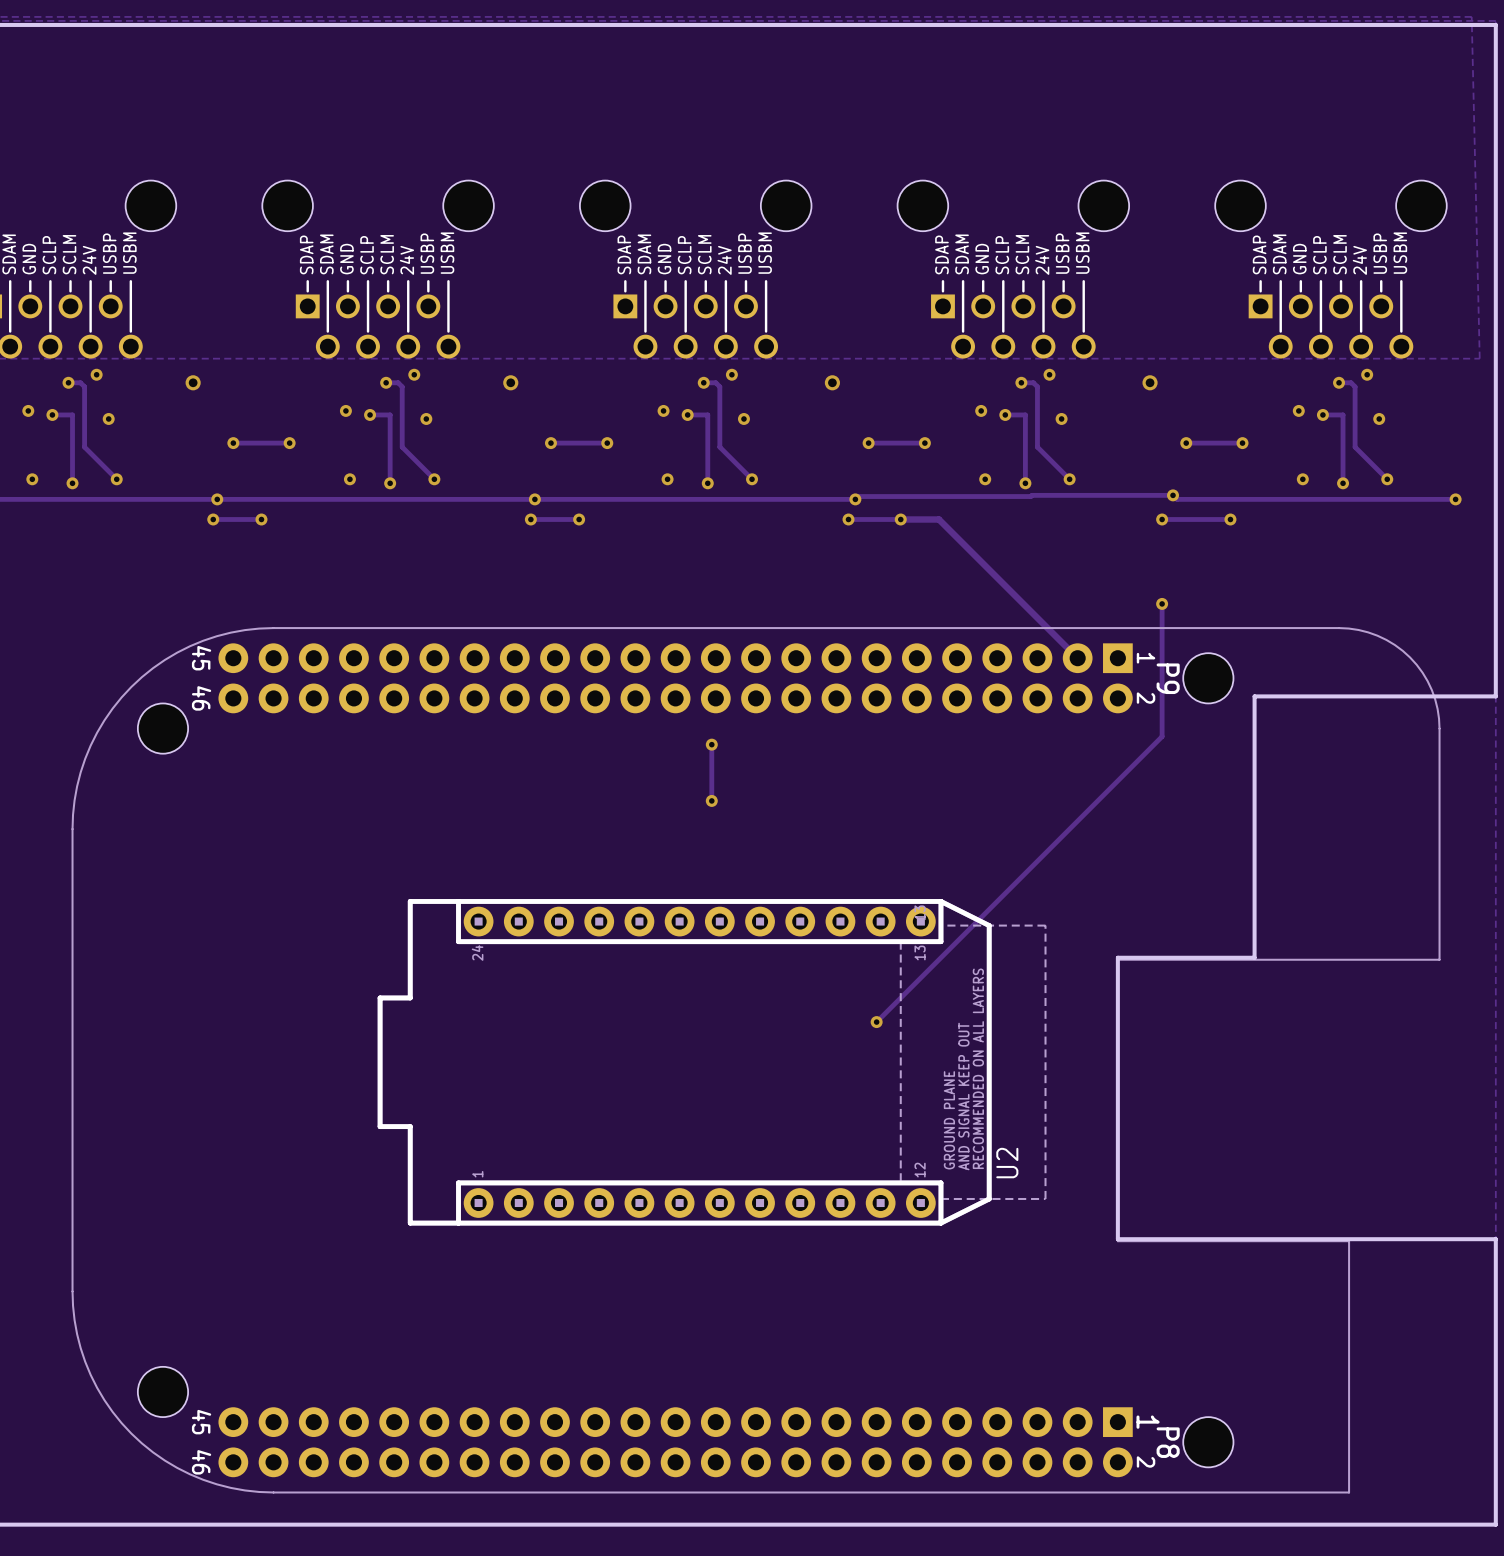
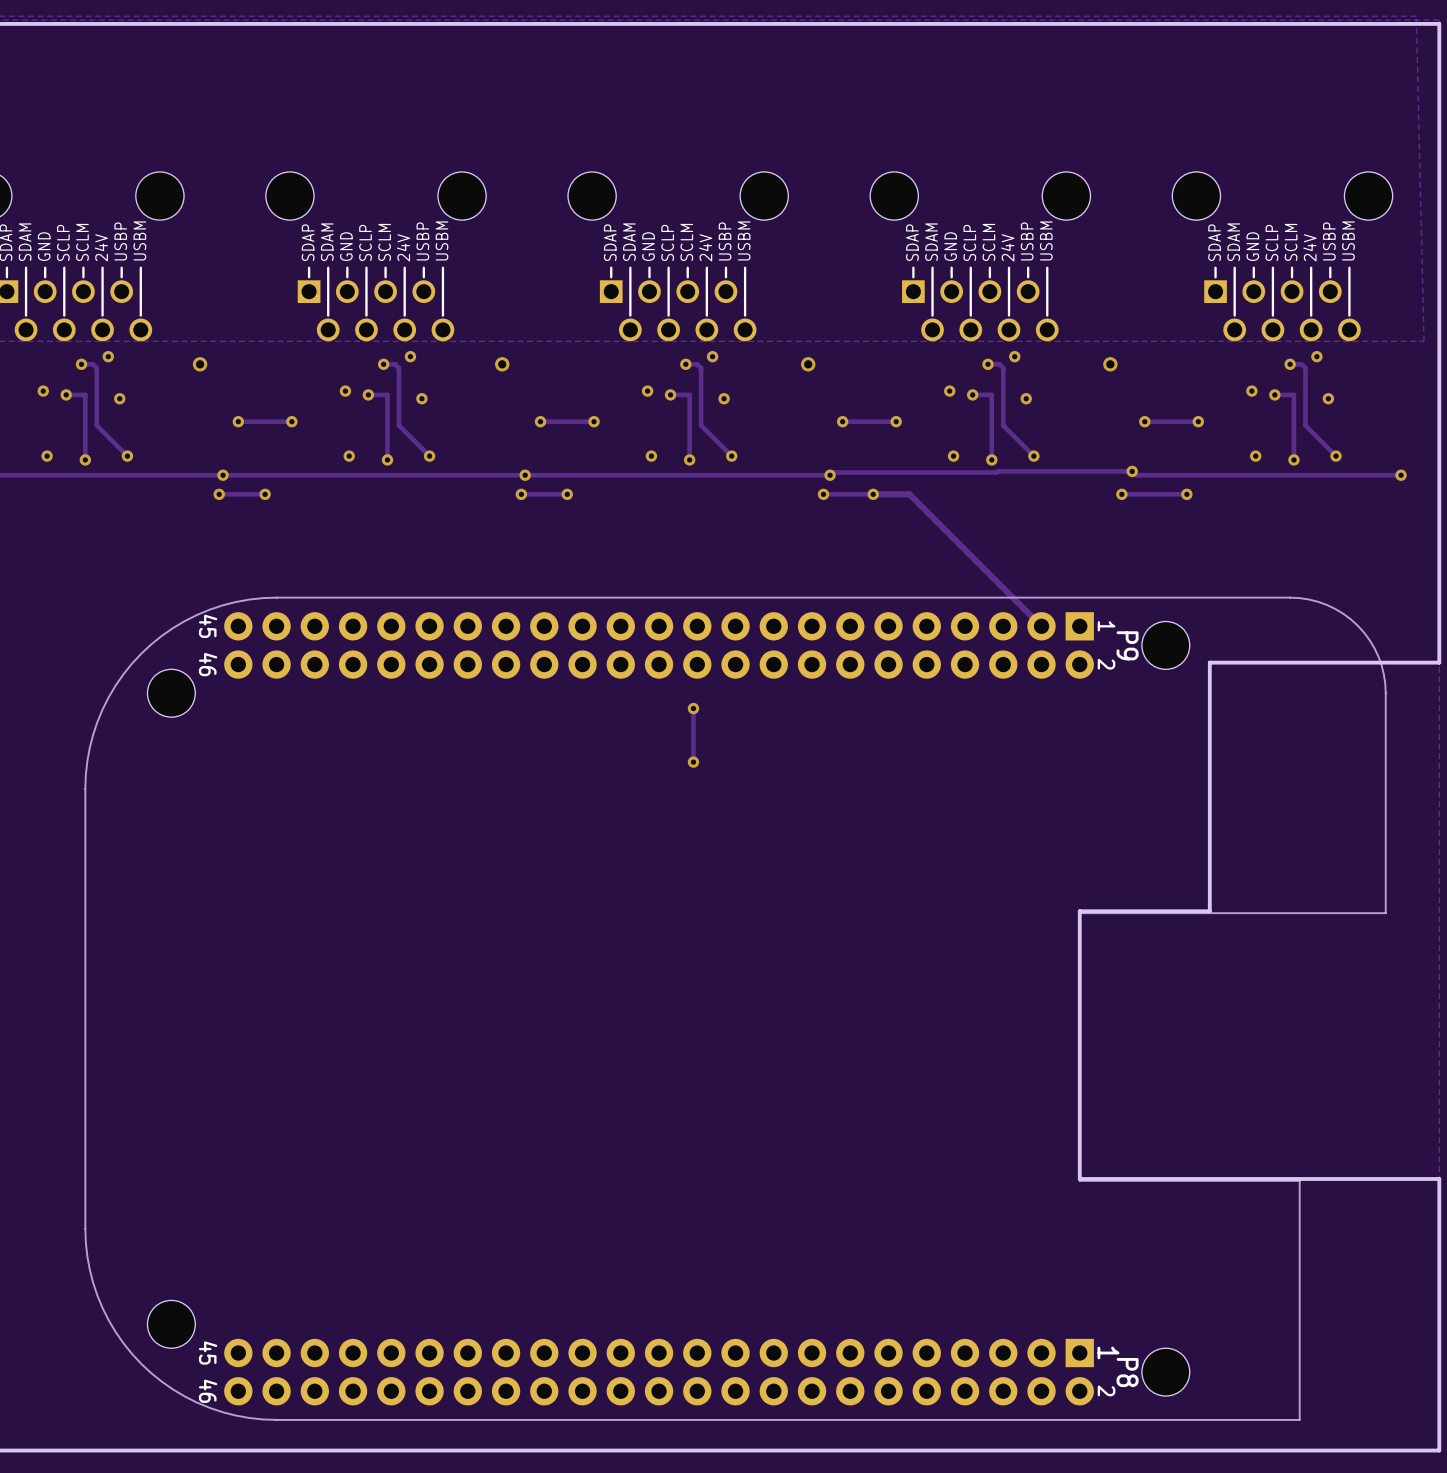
track: (1162, 603) (1162, 736) (876, 1022) -> none
via: (1162, 603) -> none
via: (876, 1022) -> none
U2: (712, 1062) -> none

